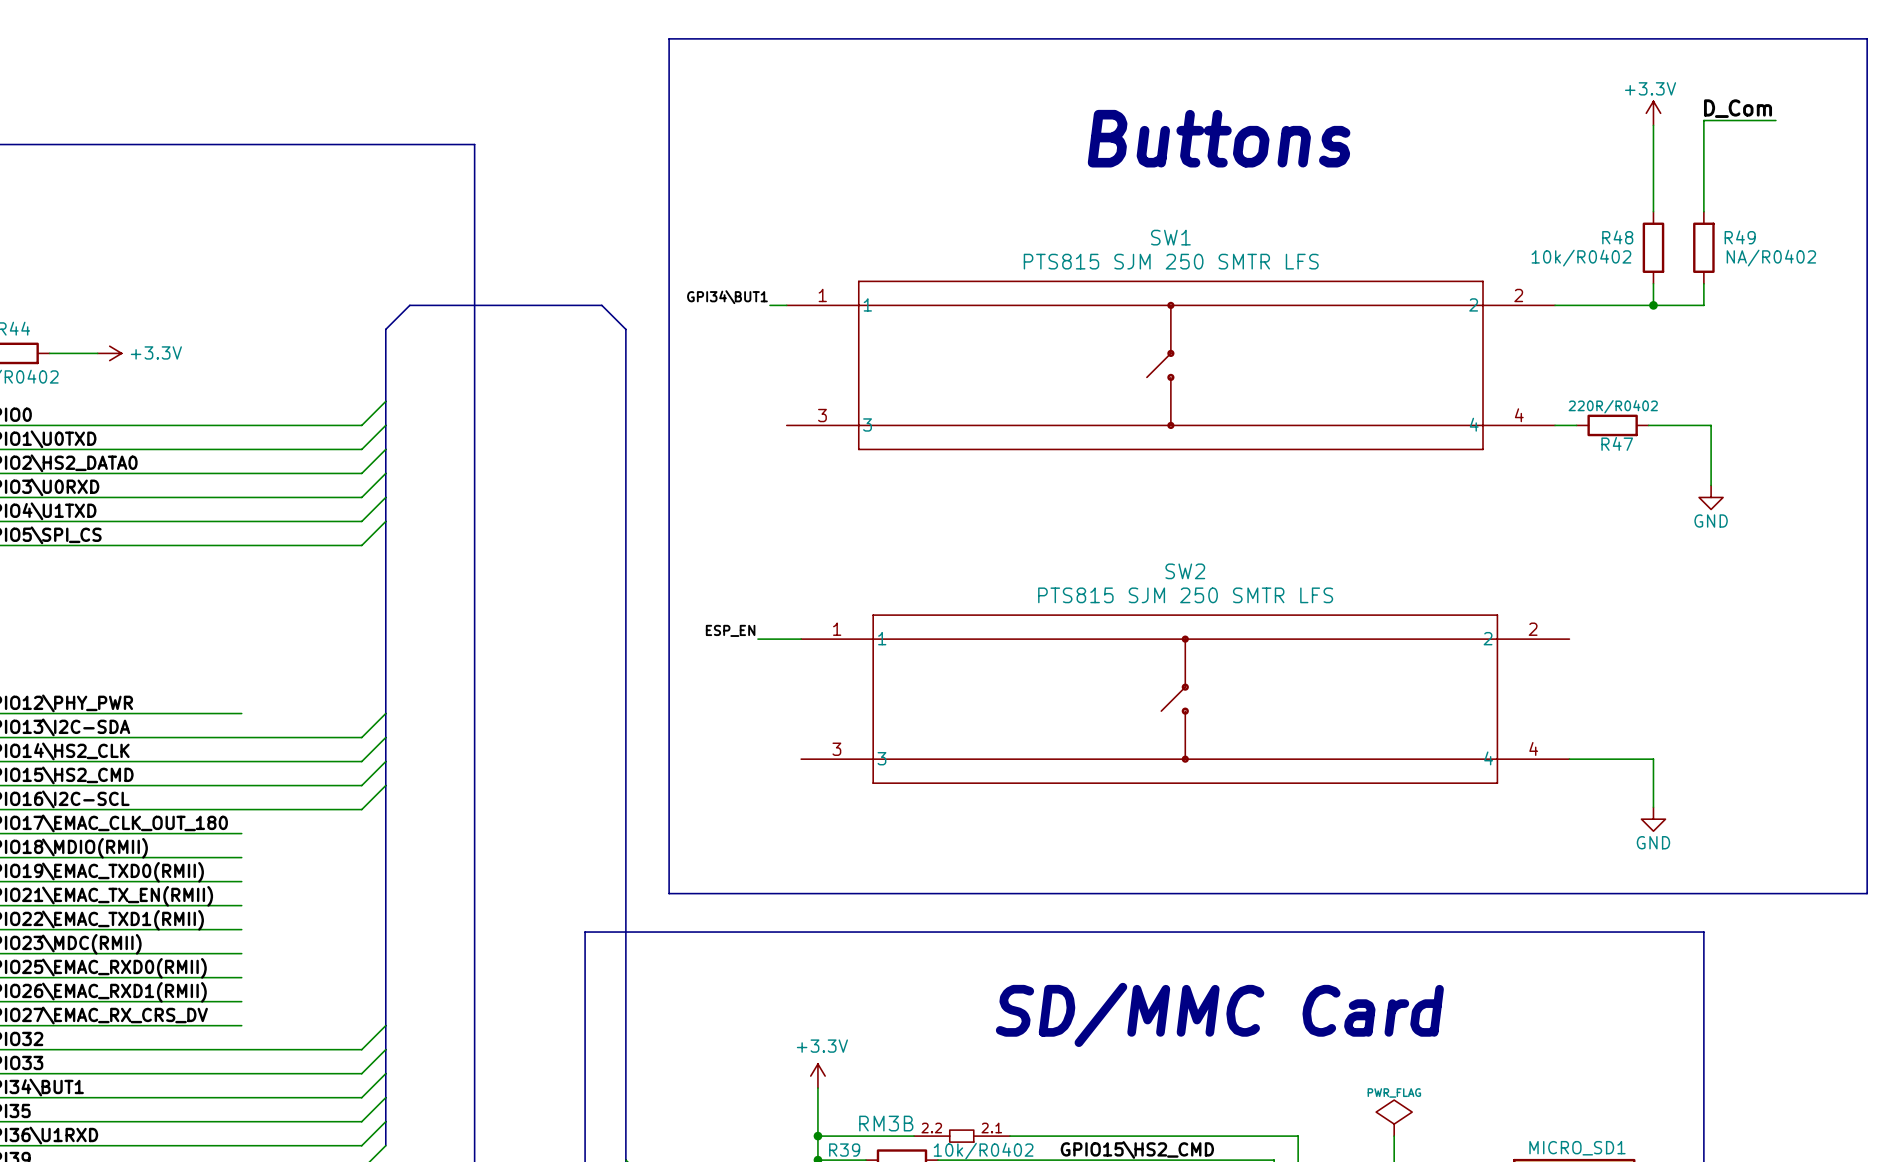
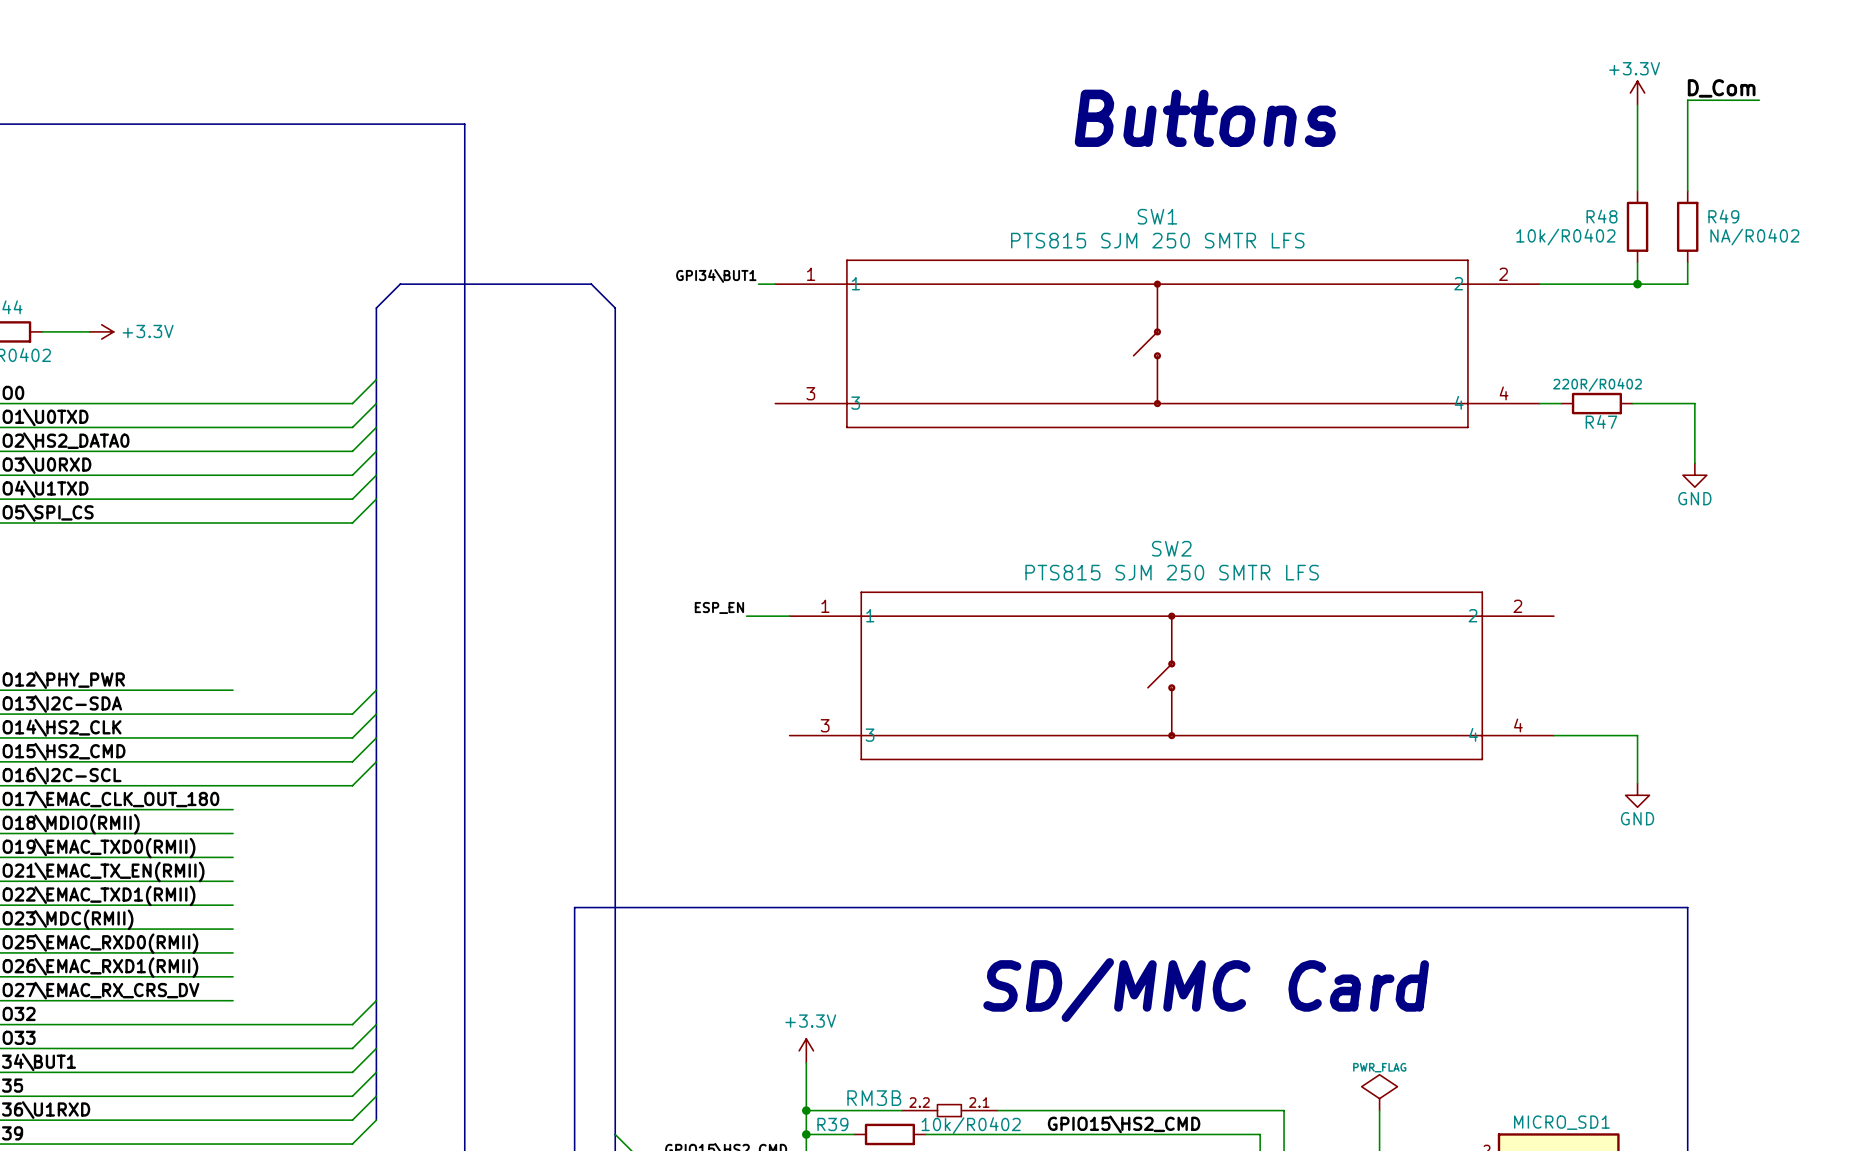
line: (669, 38) (1867, 38) (1867, 893) (669, 893) (669, 38) -> none

